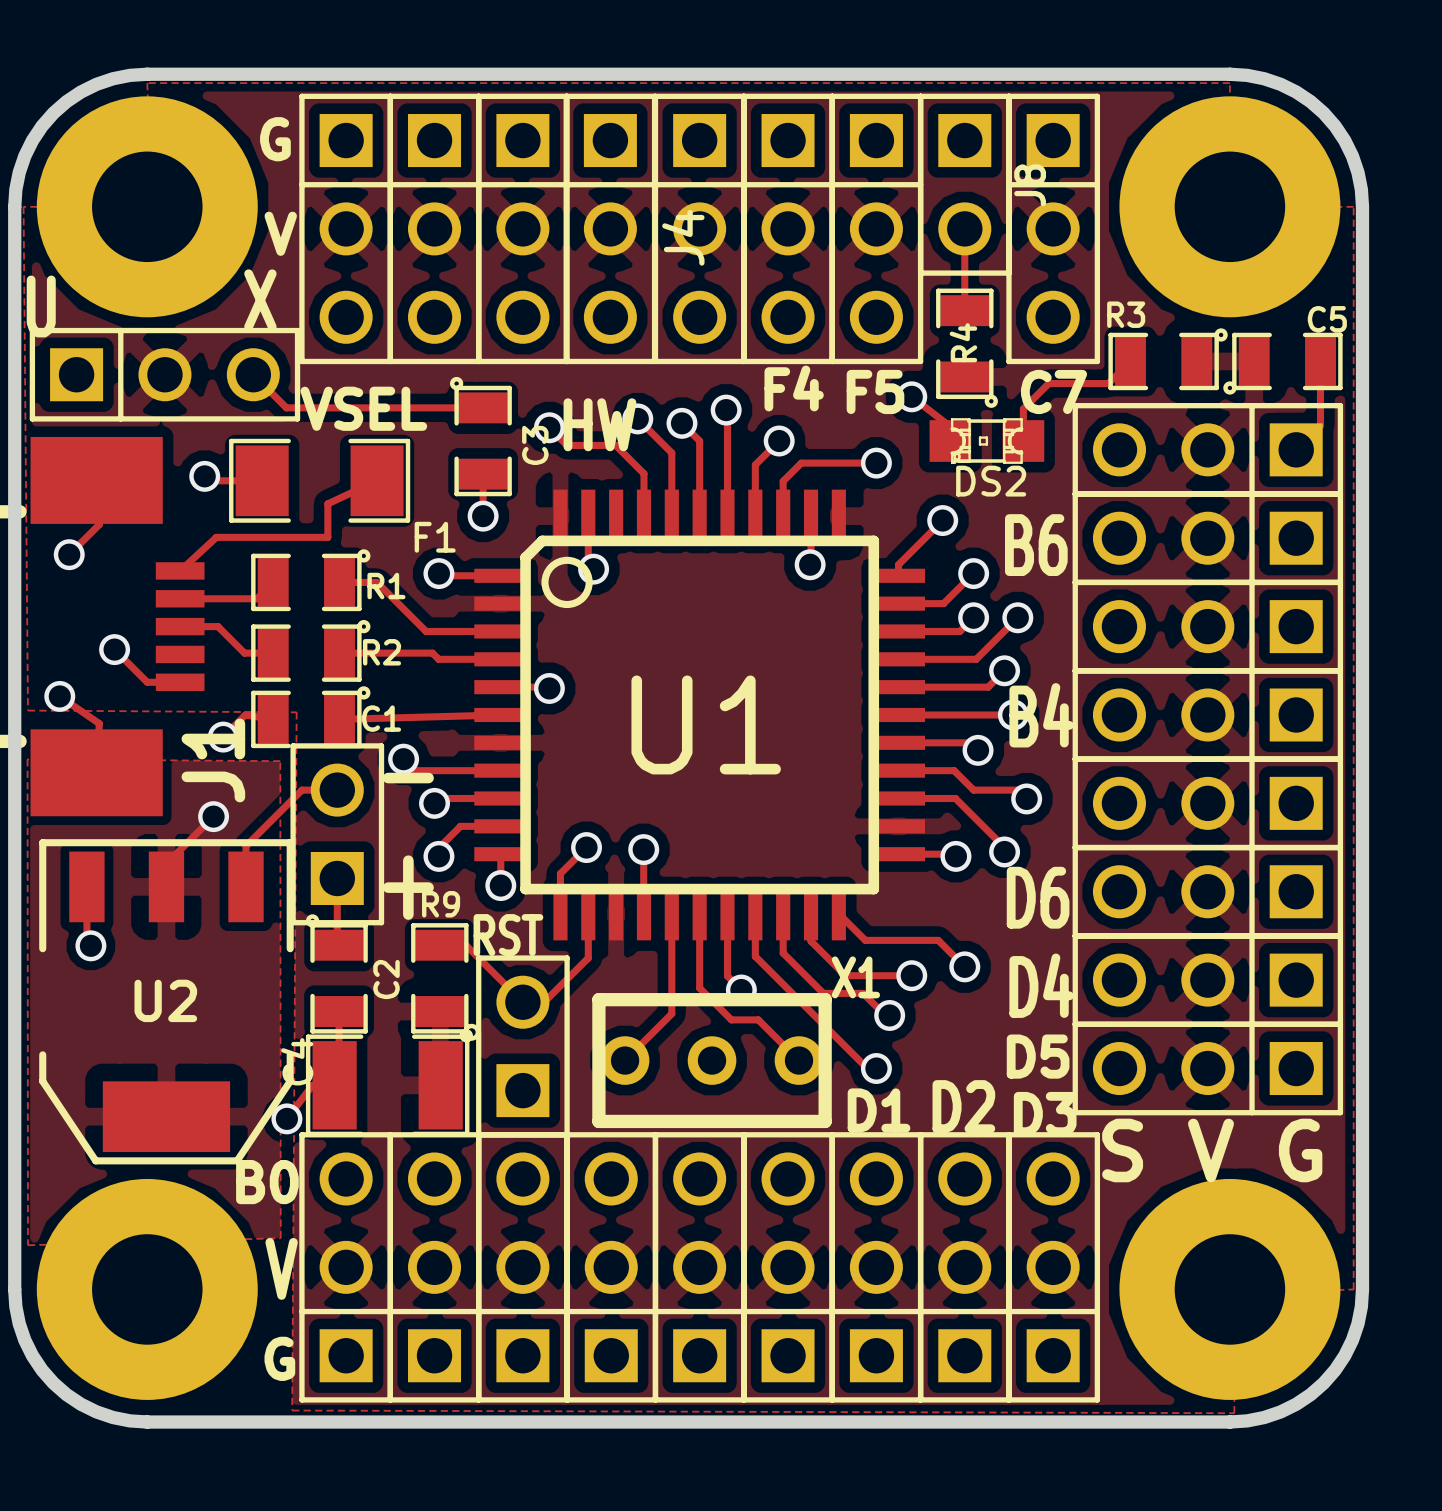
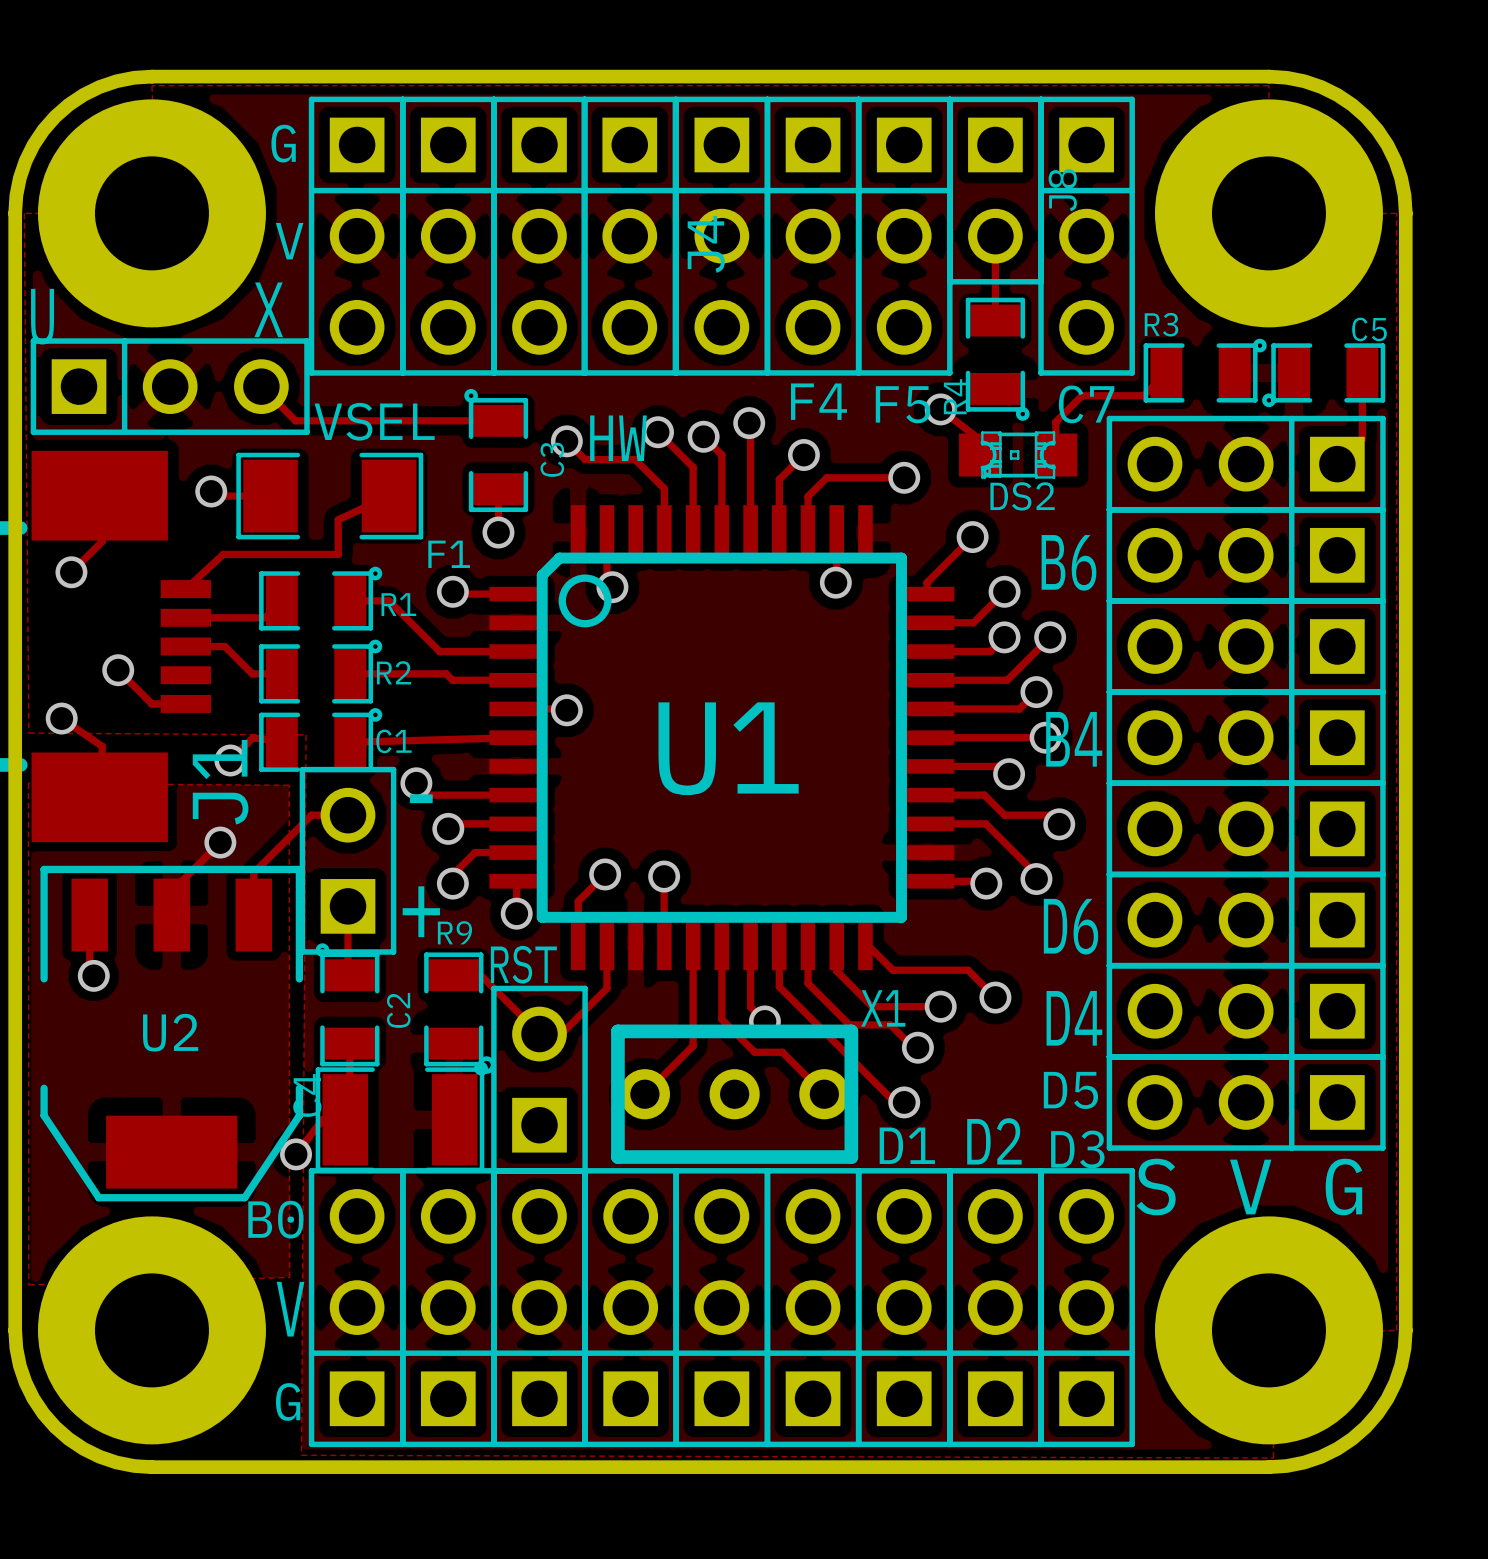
R4 name position: R4 (963, 342) -> R4 (955, 396)

